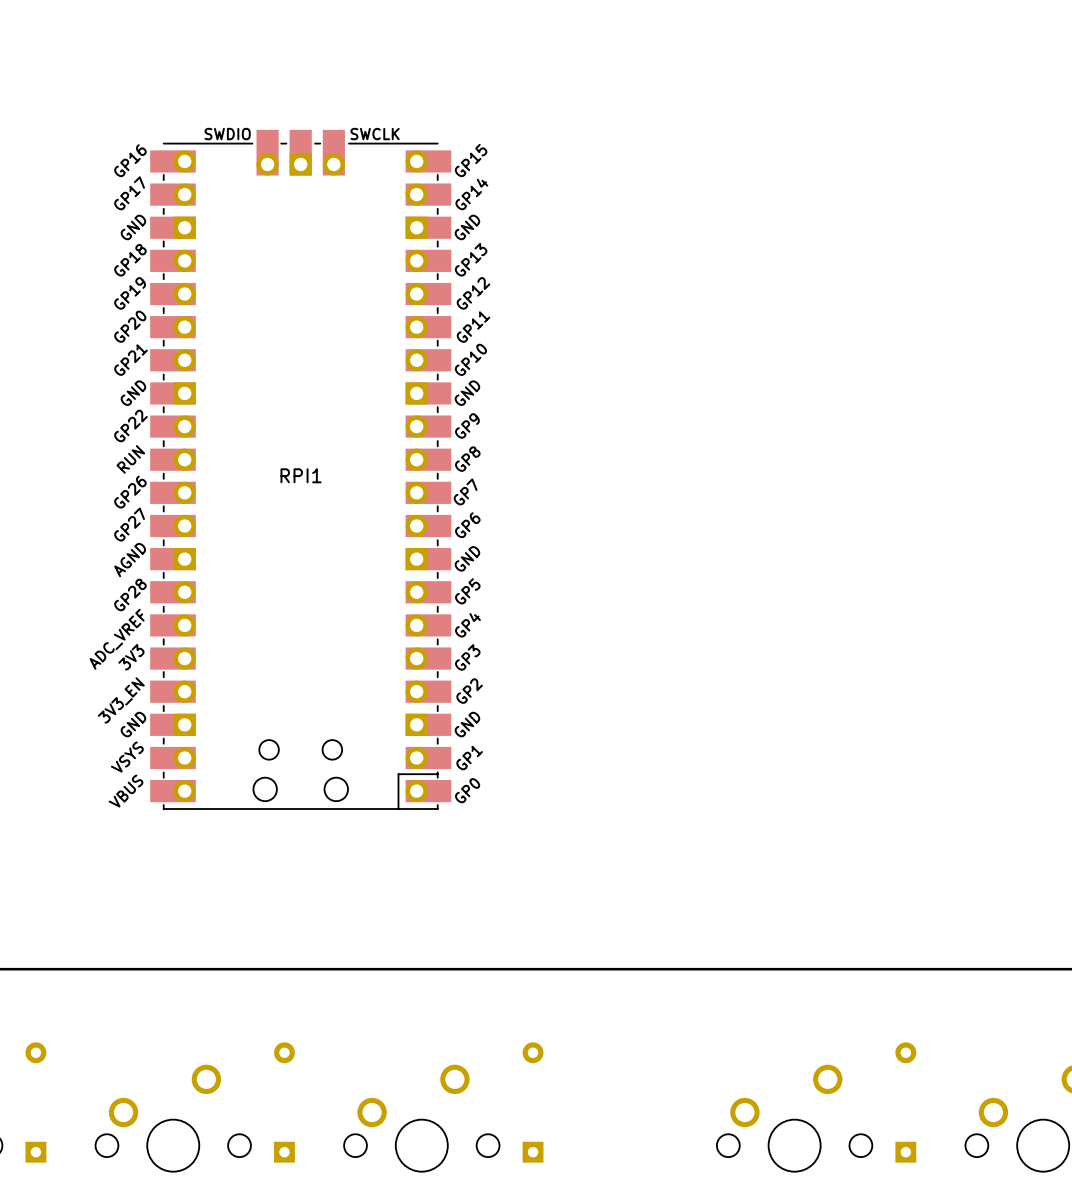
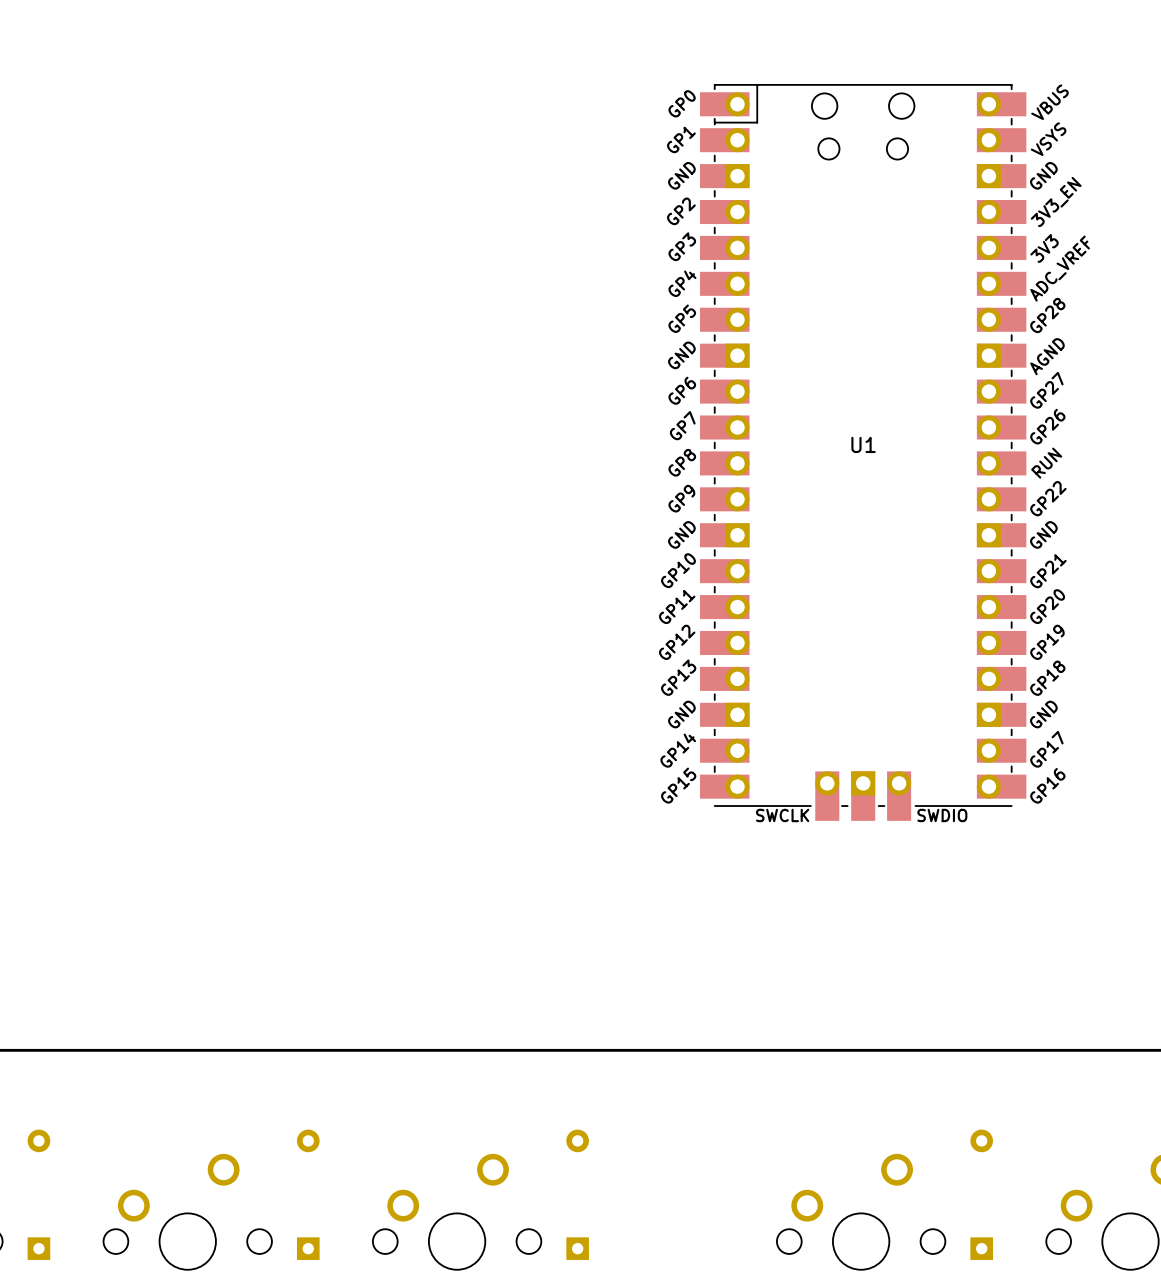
U1: none -> (863, 452)
RPI1: (300, 469) -> none

